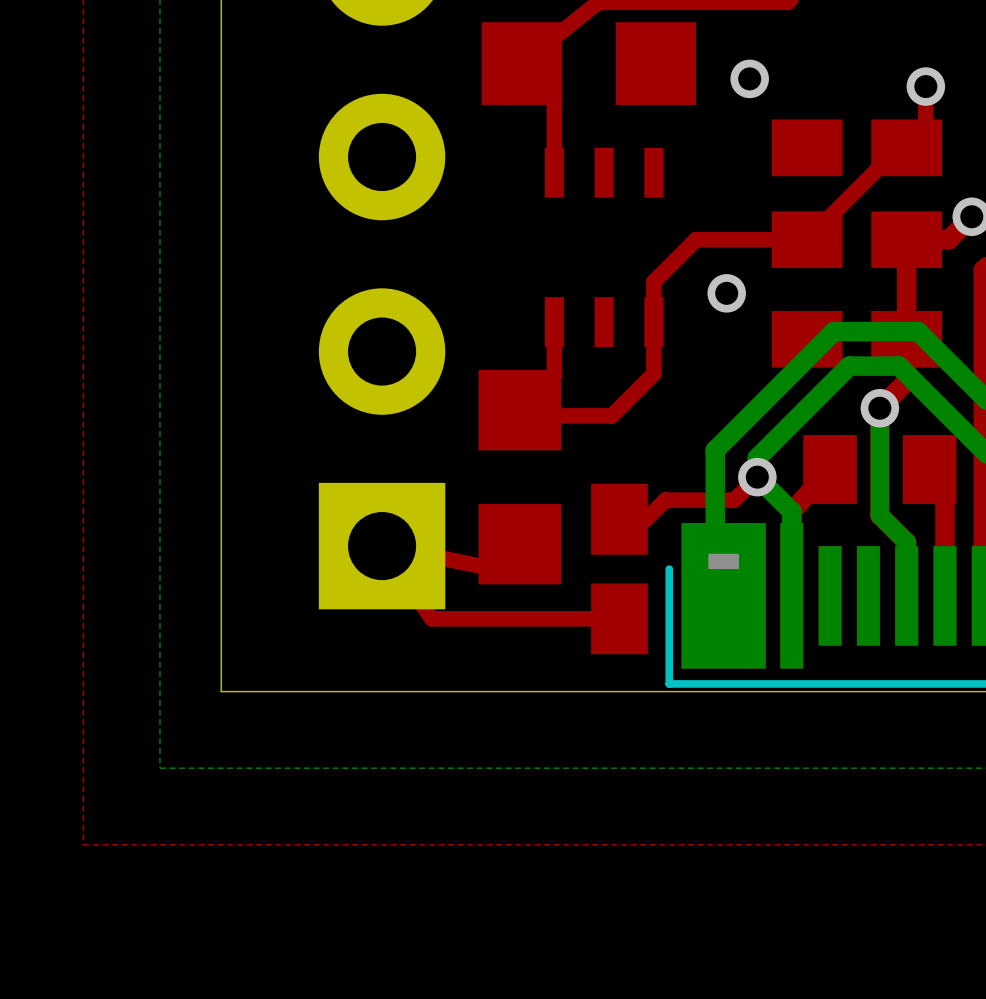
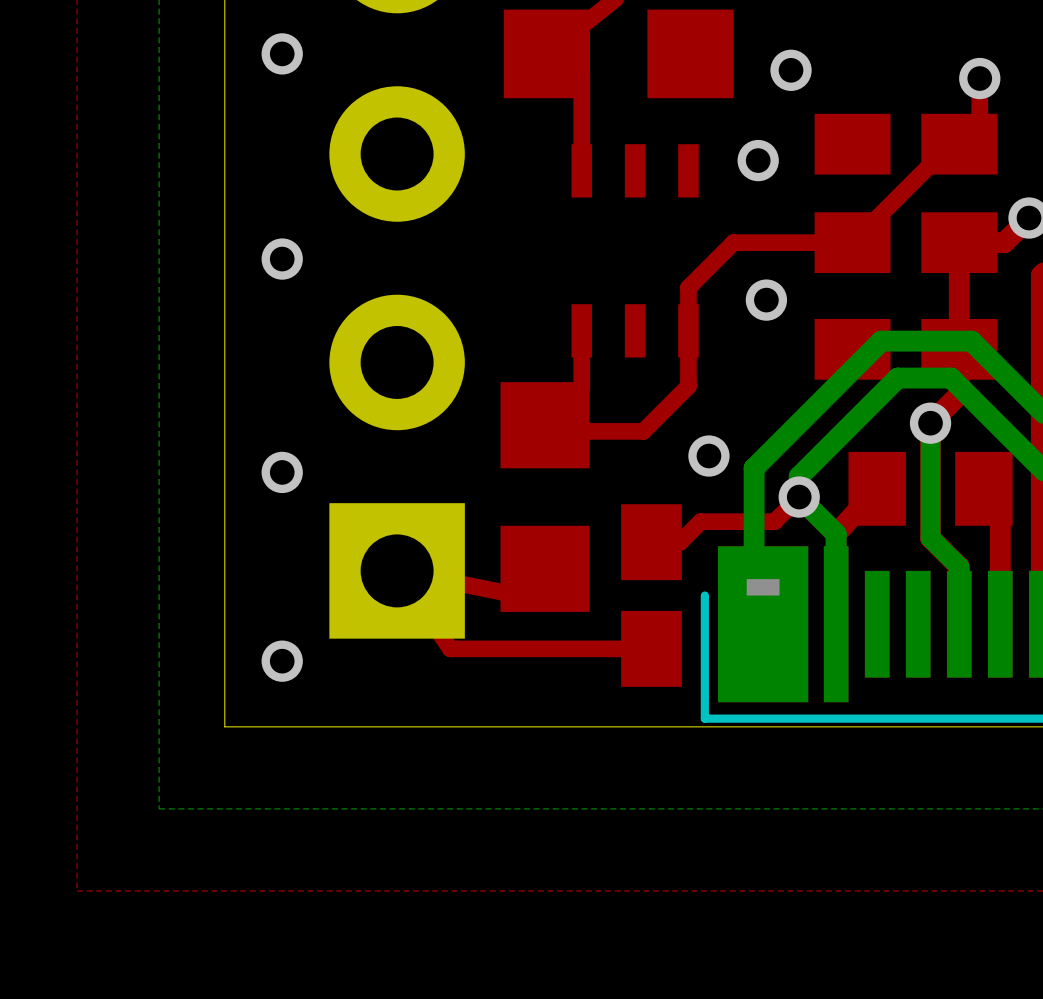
via: none -> (282, 53)
via: none -> (758, 160)
via: none -> (282, 259)
via: none -> (708, 456)
via: none -> (282, 472)
via: none -> (282, 661)

